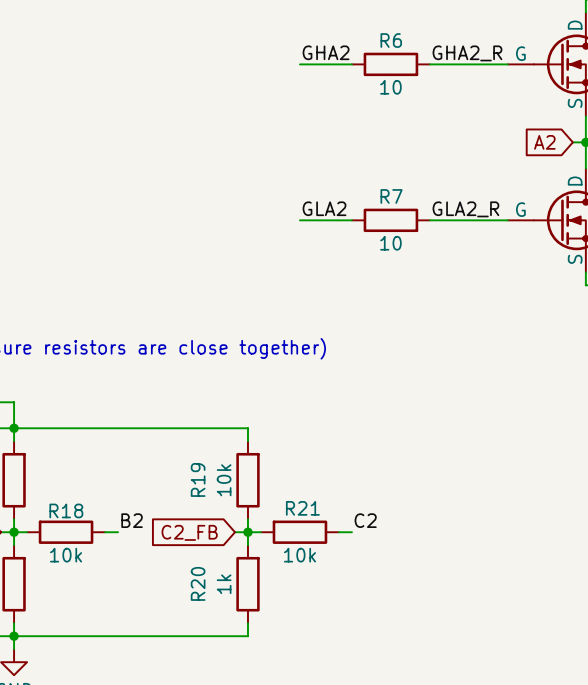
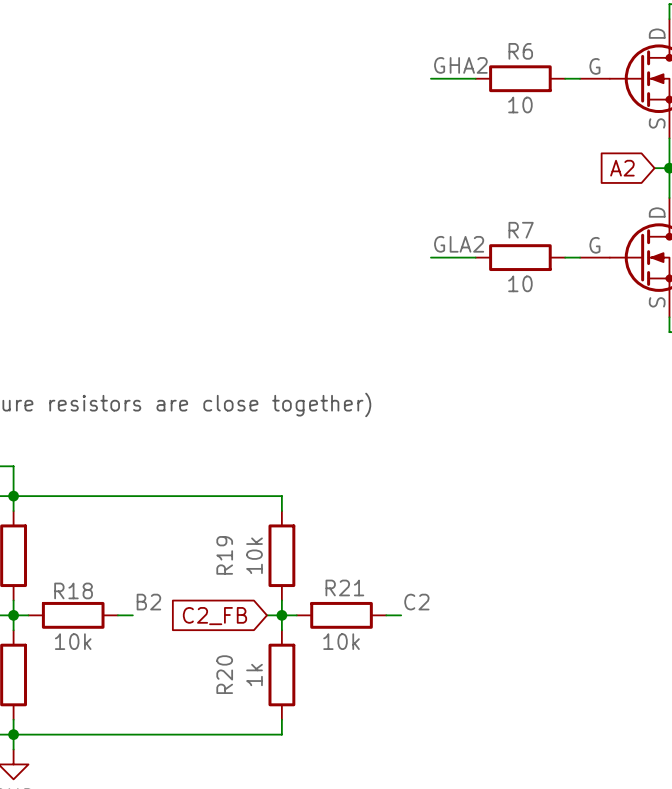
label position: GHA2 (326, 52) -> GHA2 (460, 65)
label: GHA2_R (467, 53) -> none
wire: (299, 64) (351, 64) -> none
wire: none -> (430, 78) (475, 78)
R6 position: (390, 64) -> (520, 78)
wire: (429, 64) (494, 64) -> none
label position: GLA2 (324, 208) -> GLA2 (459, 244)
label: GLA2_R (465, 209) -> none
wire: (299, 220) (351, 220) -> none
wire: none -> (430, 257) (475, 257)
R7 position: (390, 220) -> (520, 257)
wire: (429, 220) (494, 220) -> none

